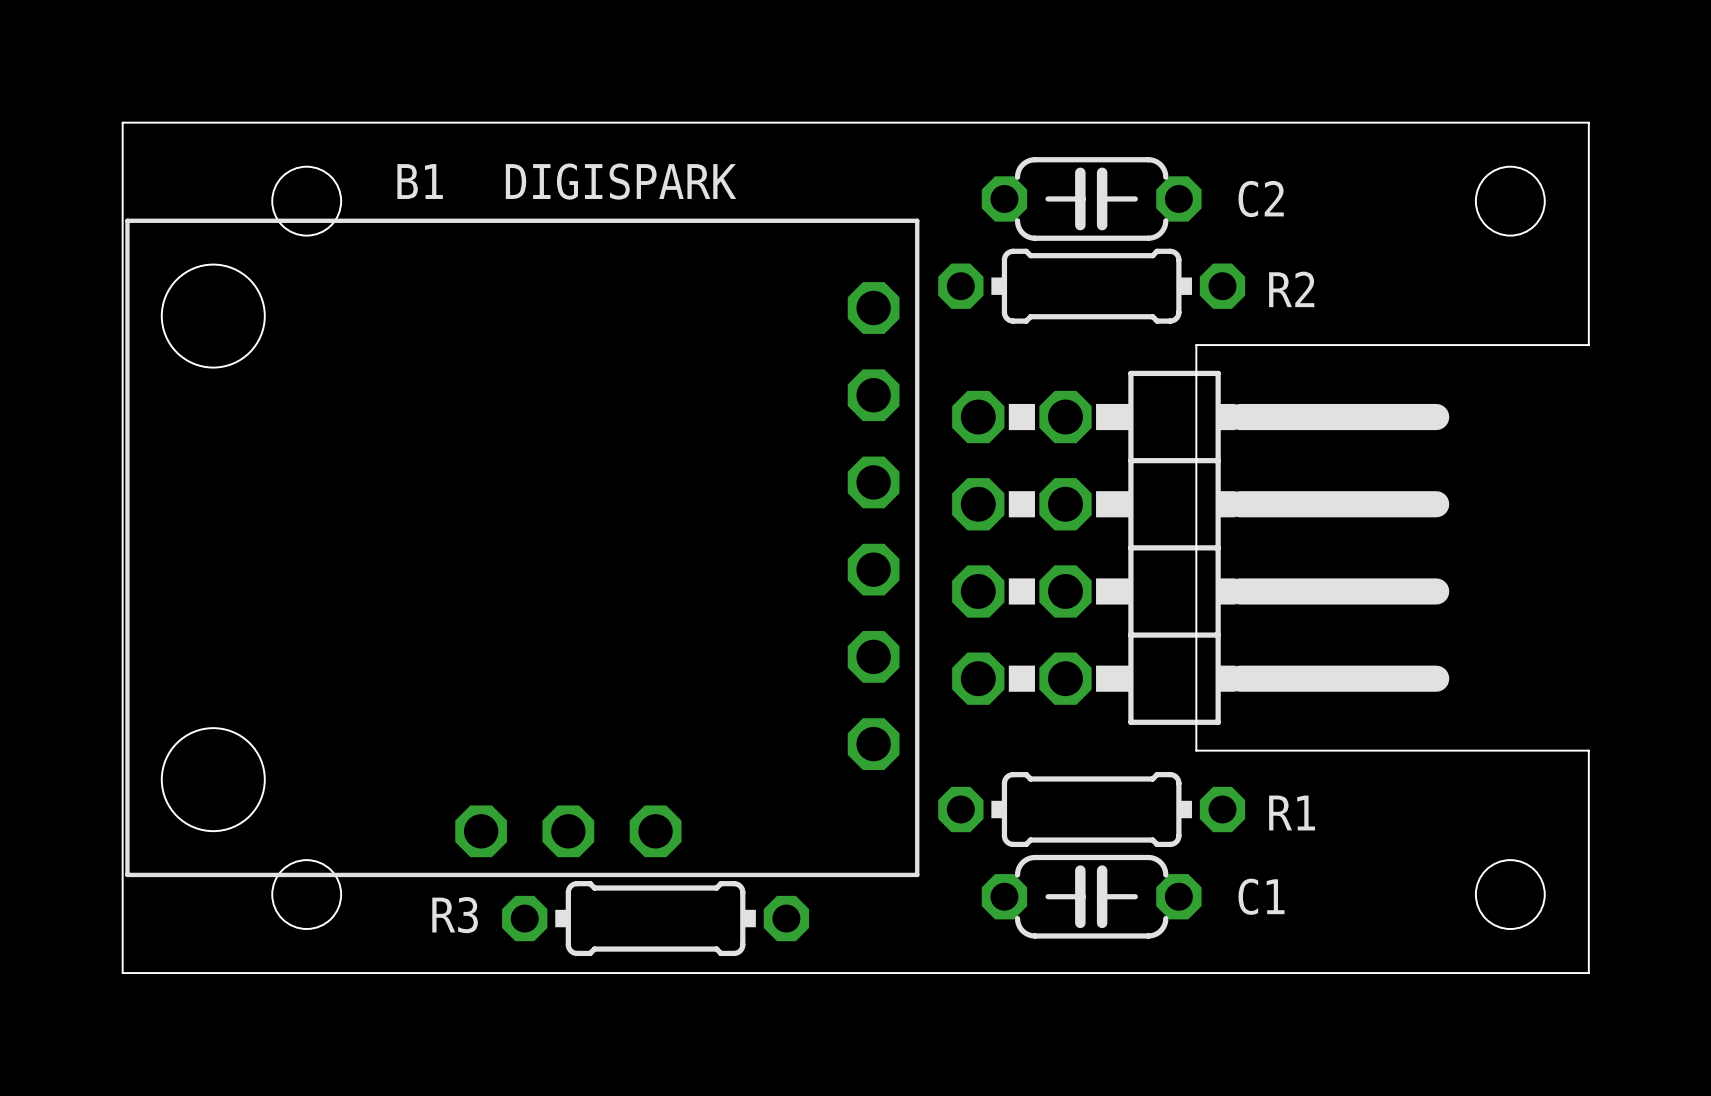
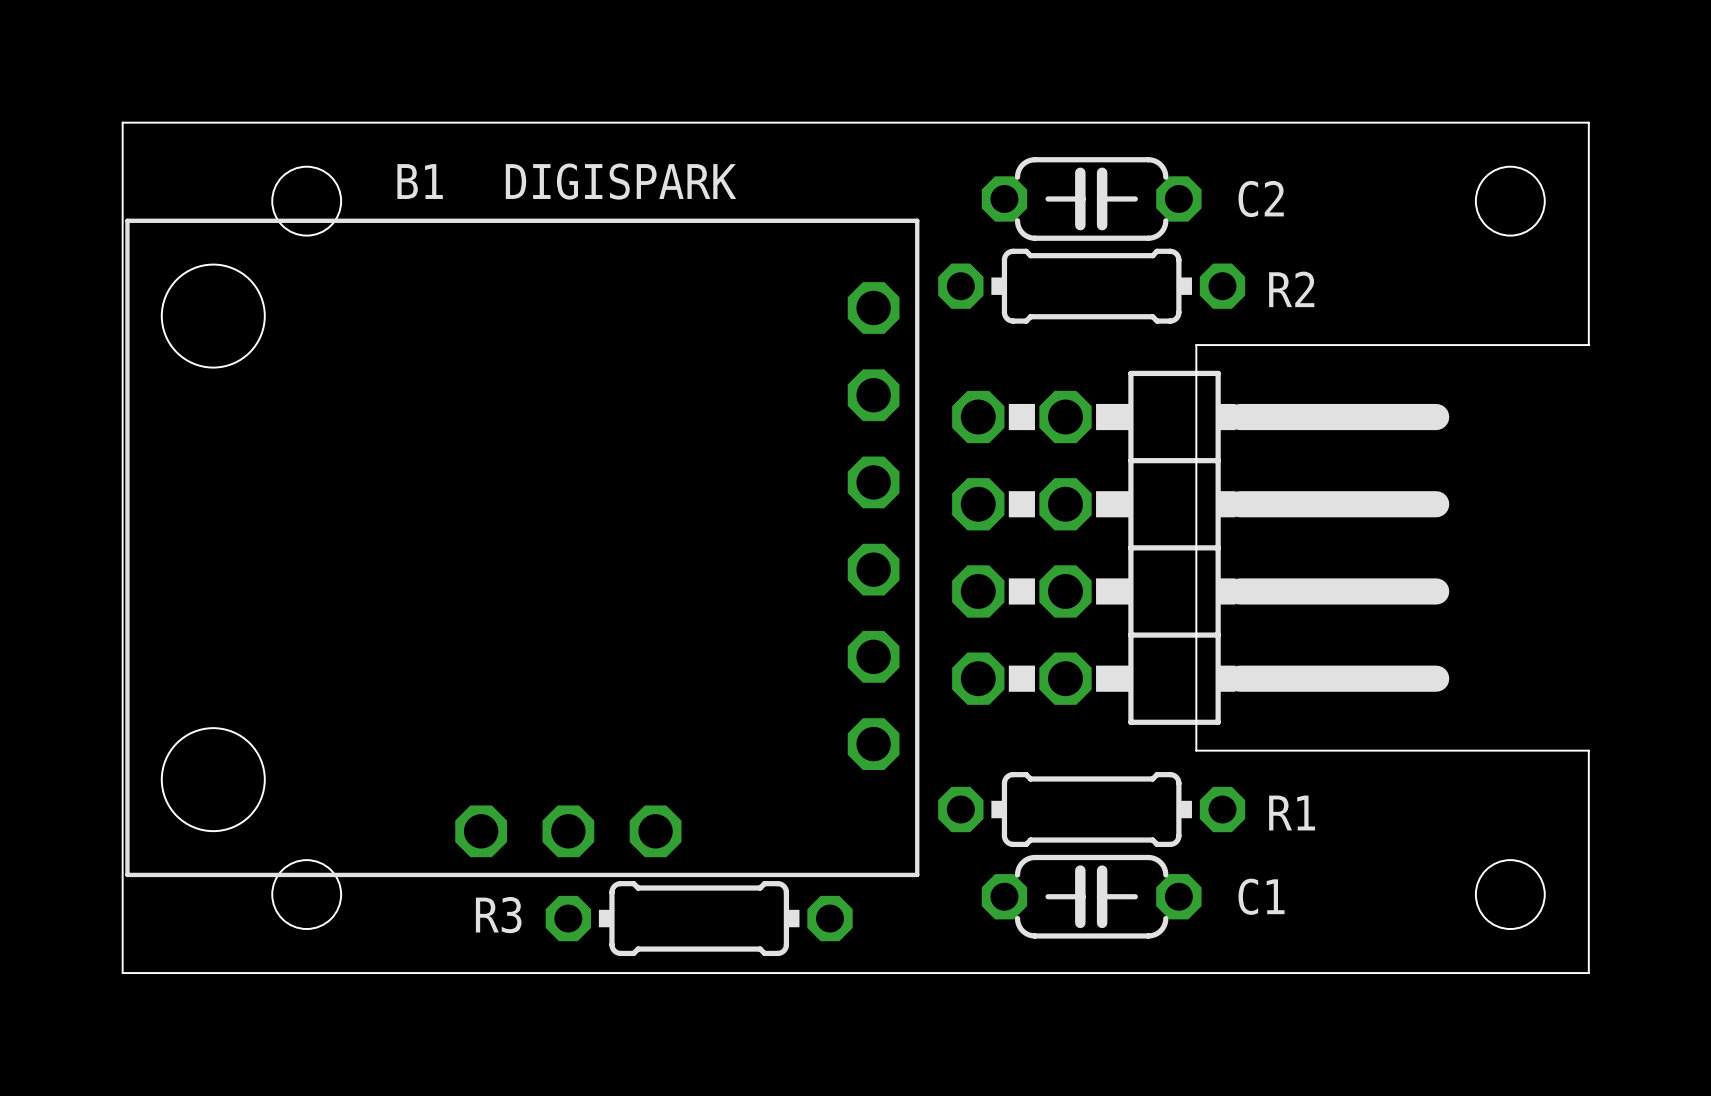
R3 position: (655, 918) -> (699, 918)

